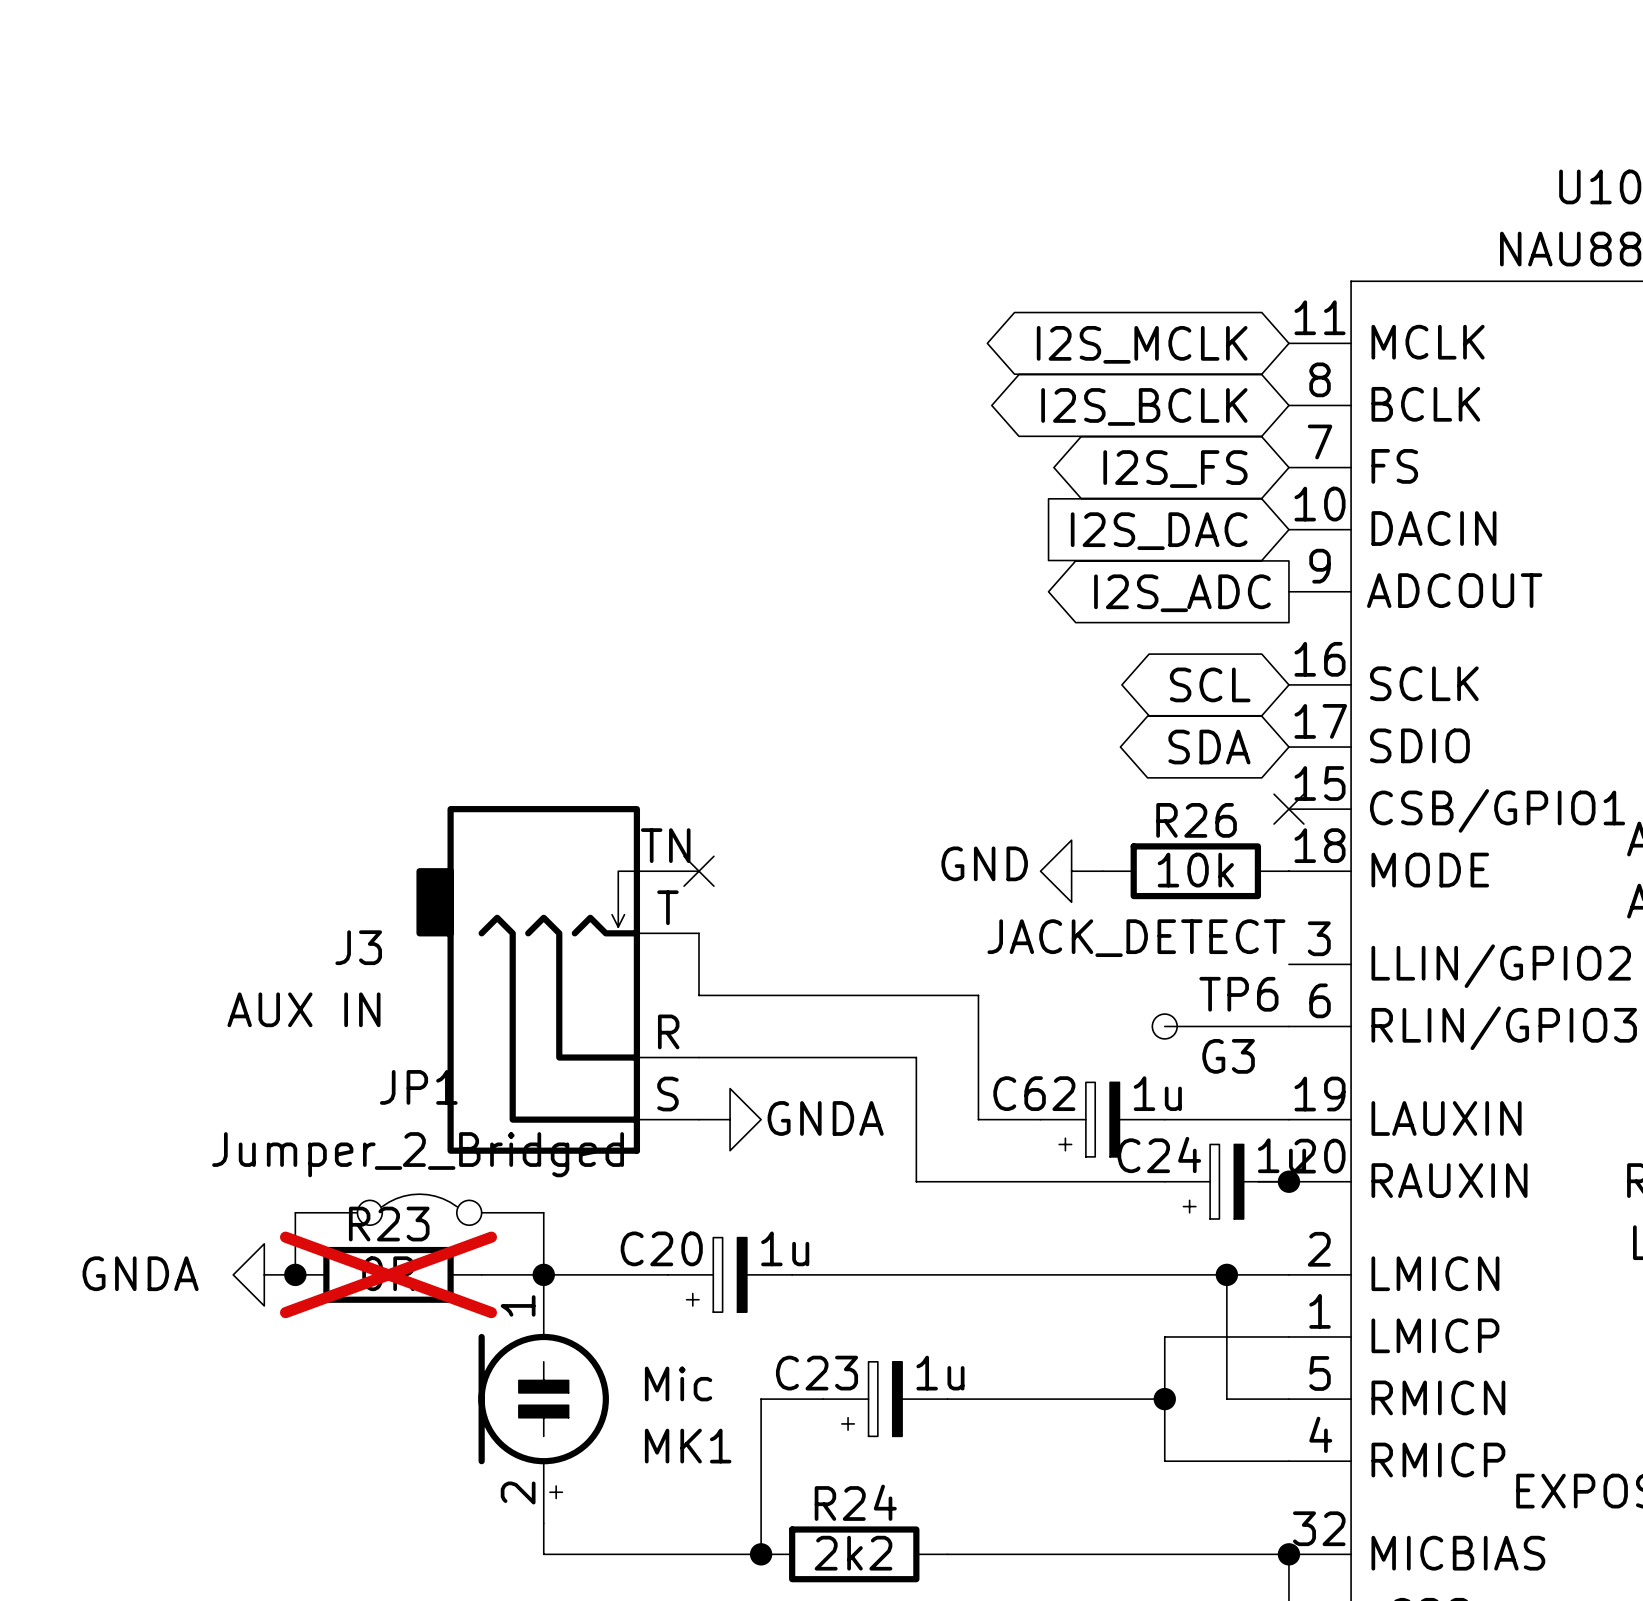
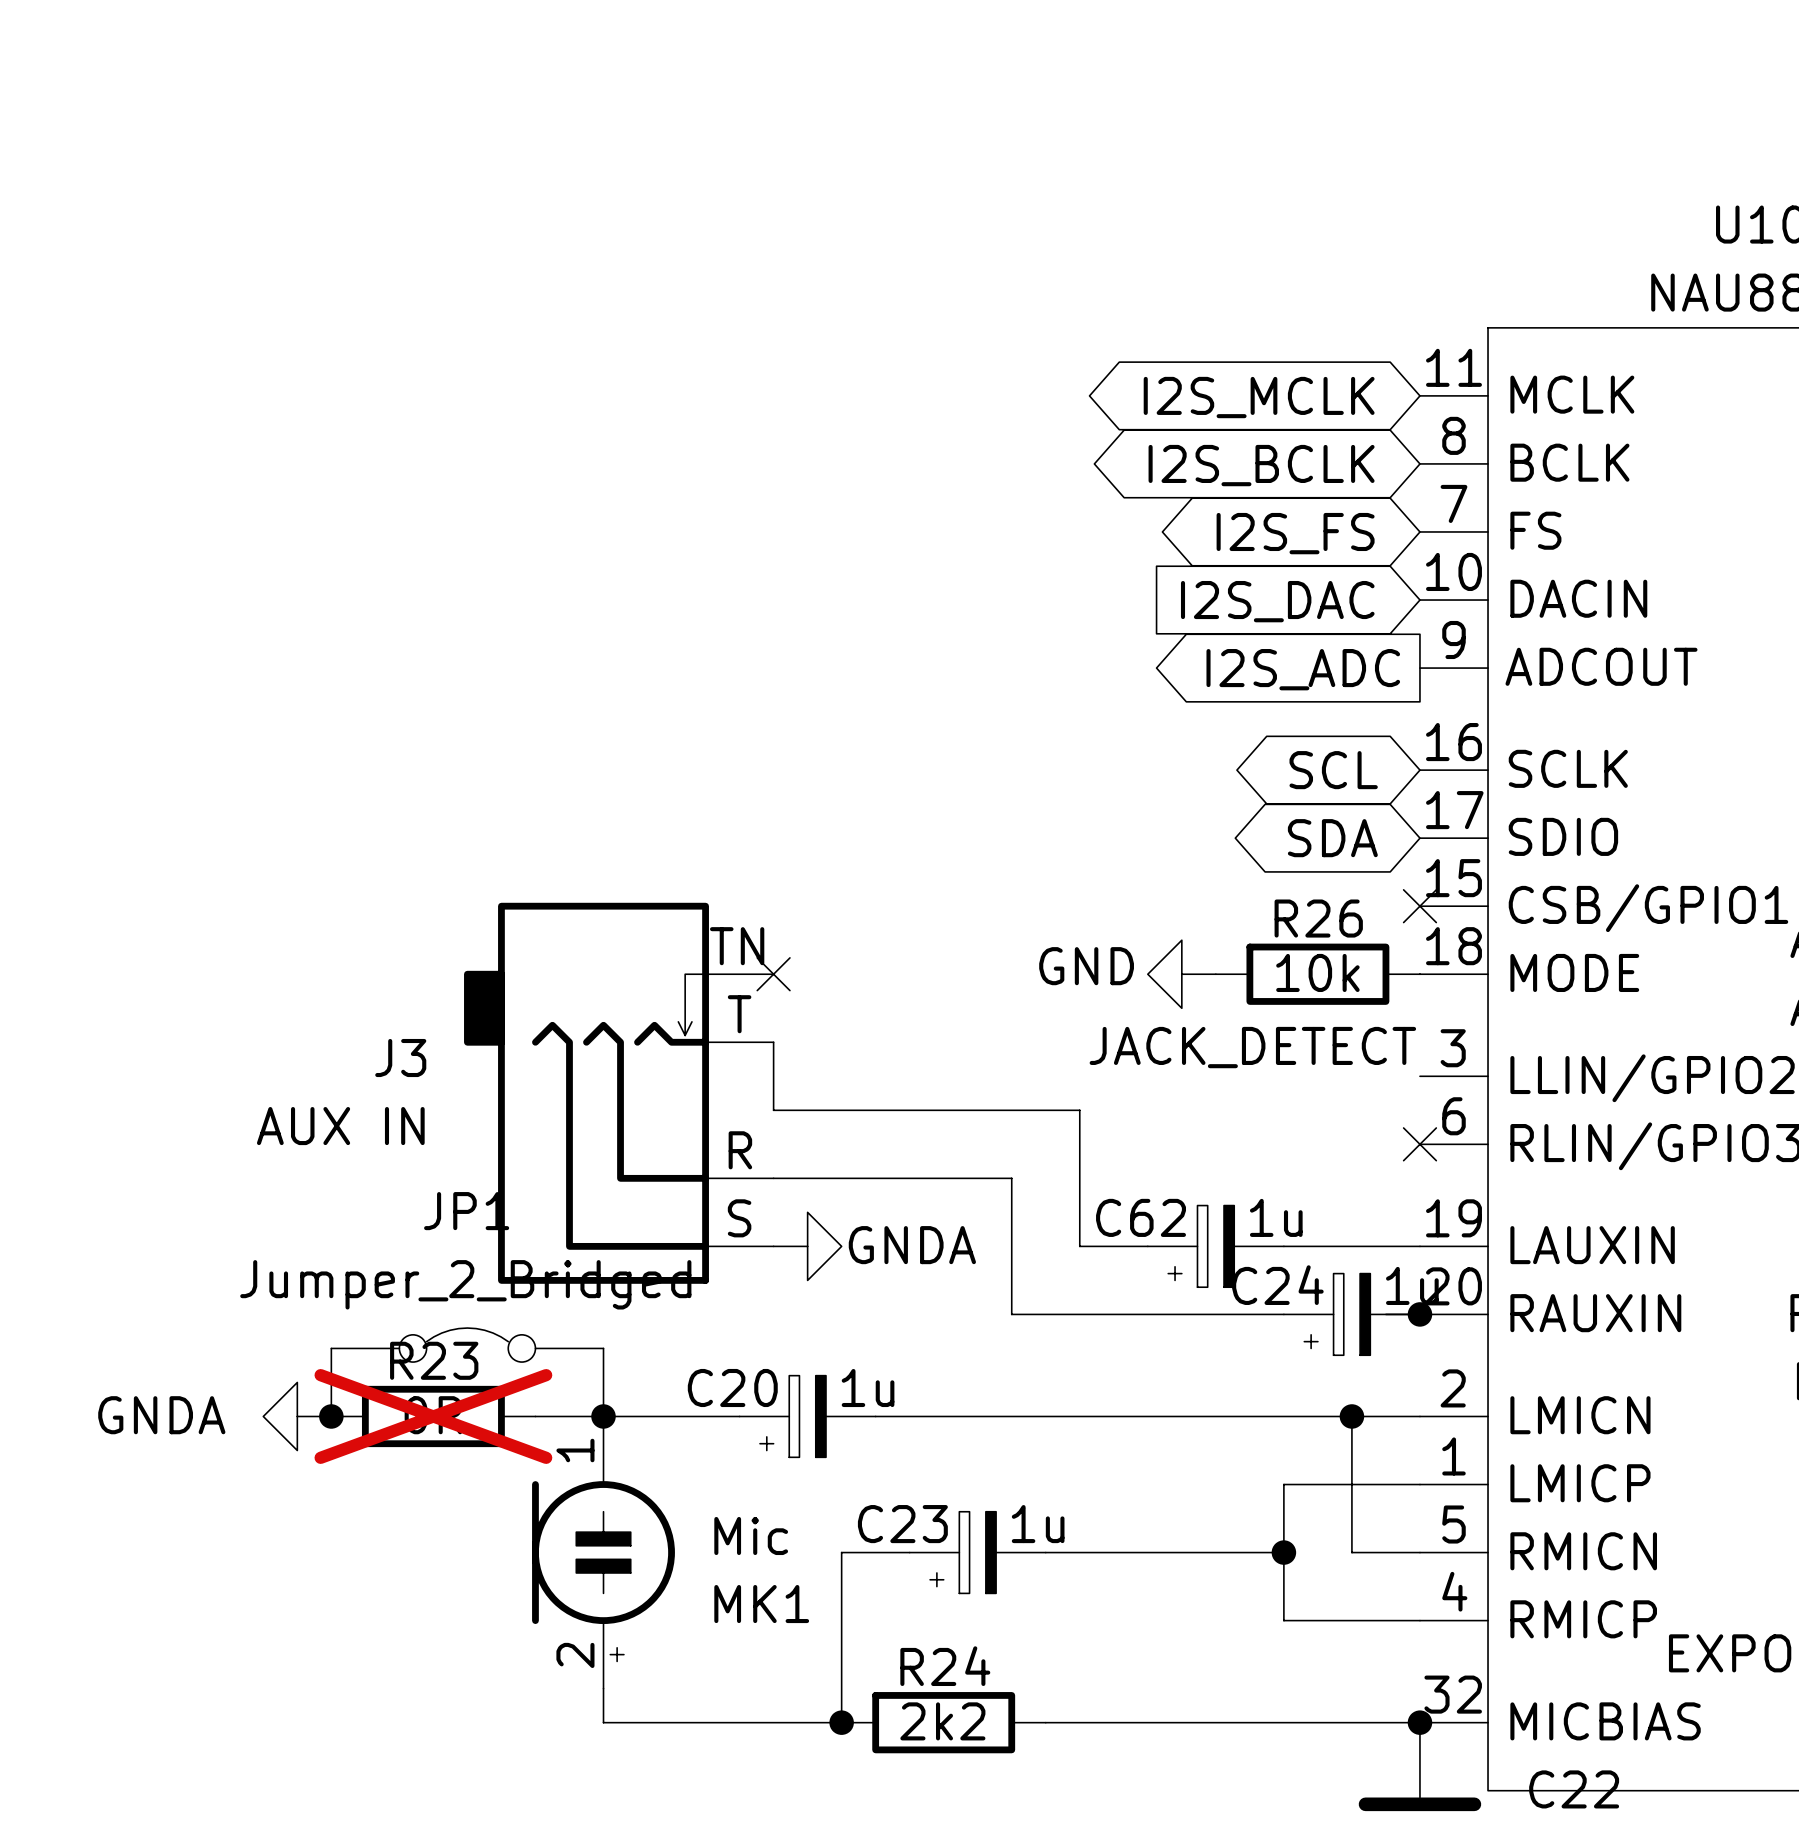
wire: (1164, 1026) (1288, 1026) -> none
TP6: G3 (1164, 1026) -> none
no-connect mark: none -> (1419, 1144)

